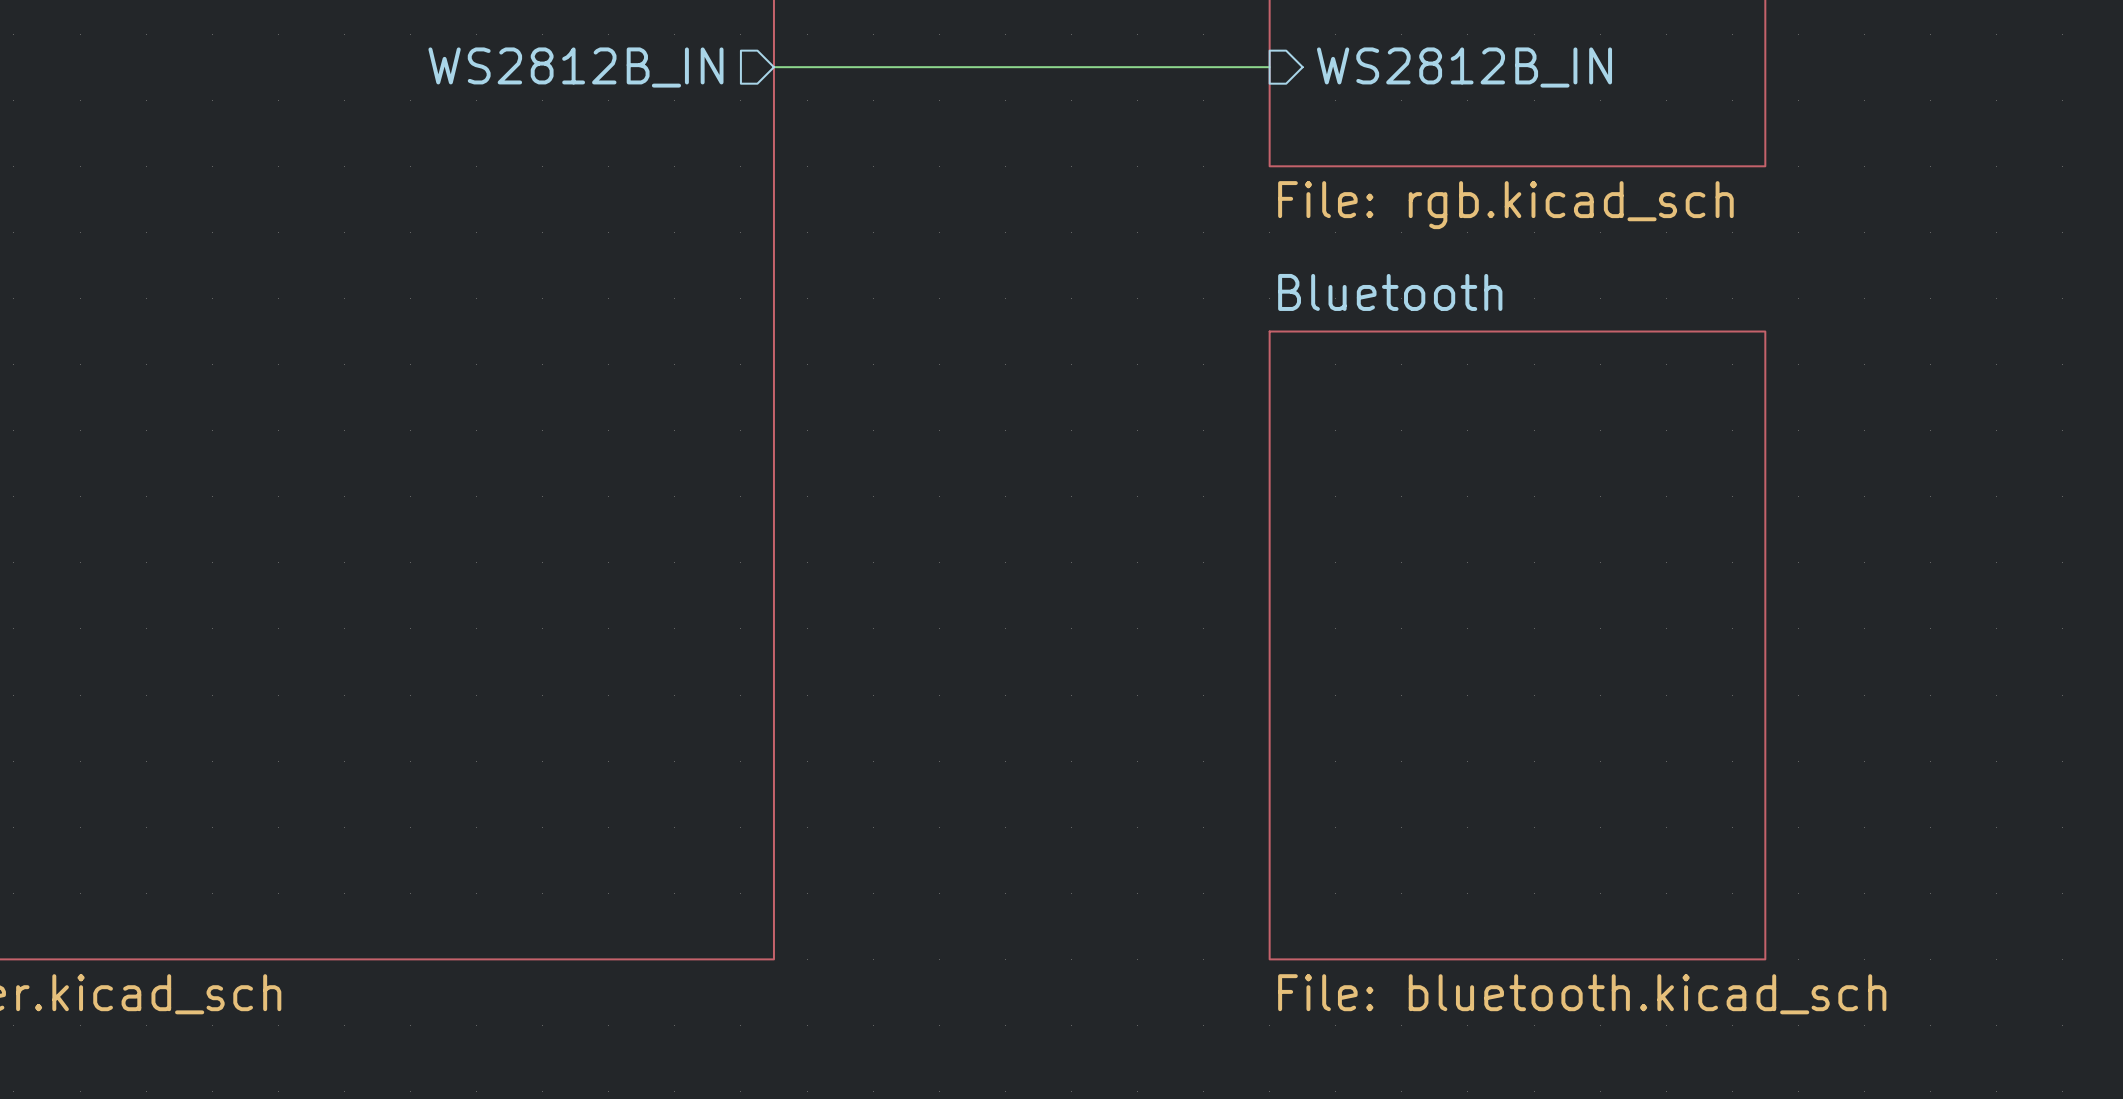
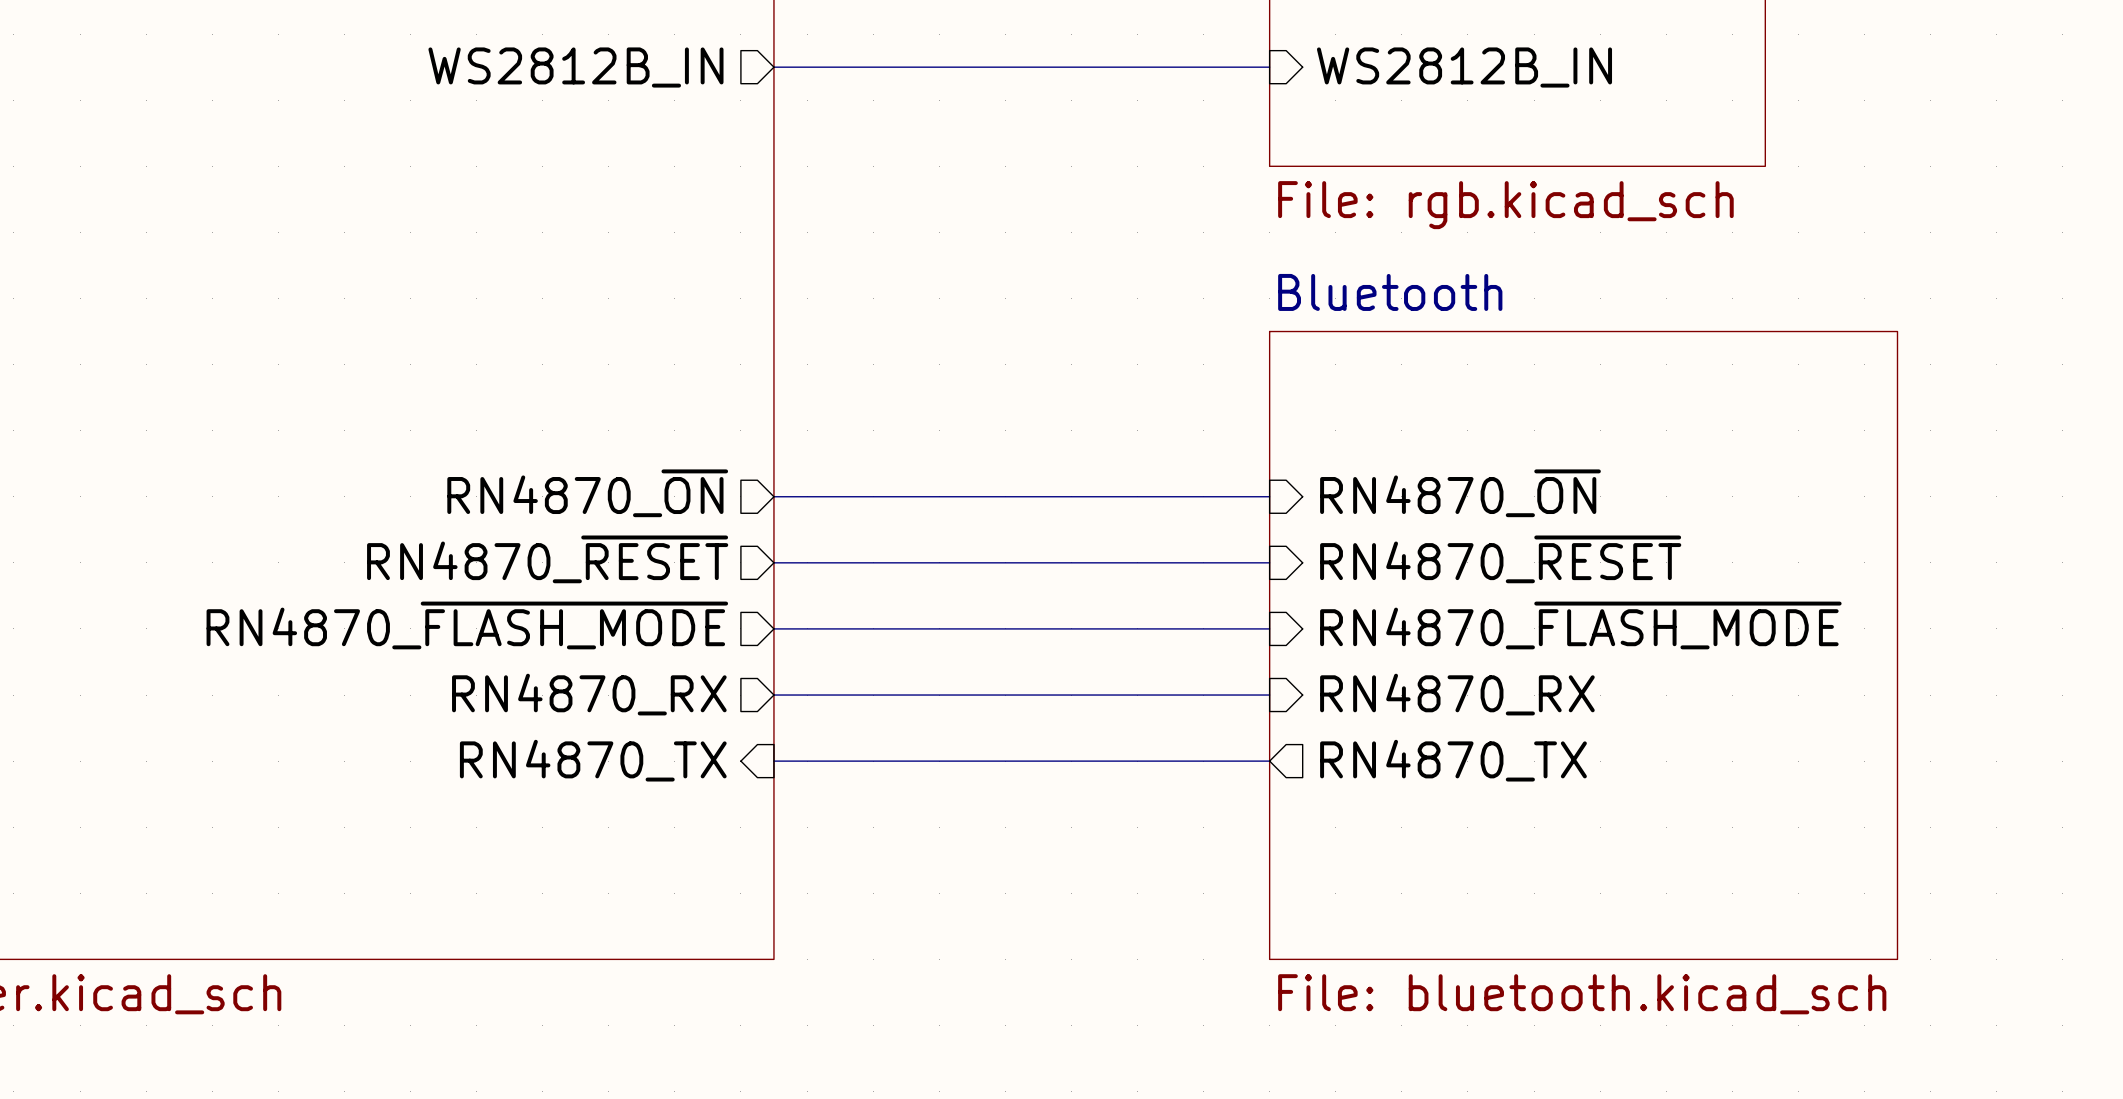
sheet pin: none -> RN4870_~{ON} (587, 493)
sheet pin: none -> RN4870_~{ON} (1460, 493)
wire: none -> (773, 496) (1269, 496)
sheet pin: none -> RN4870_~{RESET} (547, 559)
sheet pin: none -> RN4870_~{RESET} (1500, 559)
wire: none -> (773, 562) (1269, 562)
sheet pin: none -> RN4870_~{FLASH_MODE} (467, 625)
sheet pin: none -> RN4870_~{FLASH_MODE} (1580, 625)
wire: none -> (773, 628) (1269, 628)
sheet Bluetooth: File: bluetooth.kicad_sch (1517, 645) -> none
sheet Bluetooth: none -> File: bluetooth.kicad_sch (1583, 645)
sheet pin: none -> RN4870_RX (589, 694)
sheet pin: none -> RN4870_RX (1457, 694)
wire: none -> (773, 695) (1269, 695)
sheet pin: none -> RN4870_TX (593, 760)
sheet pin: none -> RN4870_TX (1453, 760)
wire: none -> (773, 761) (1269, 761)

